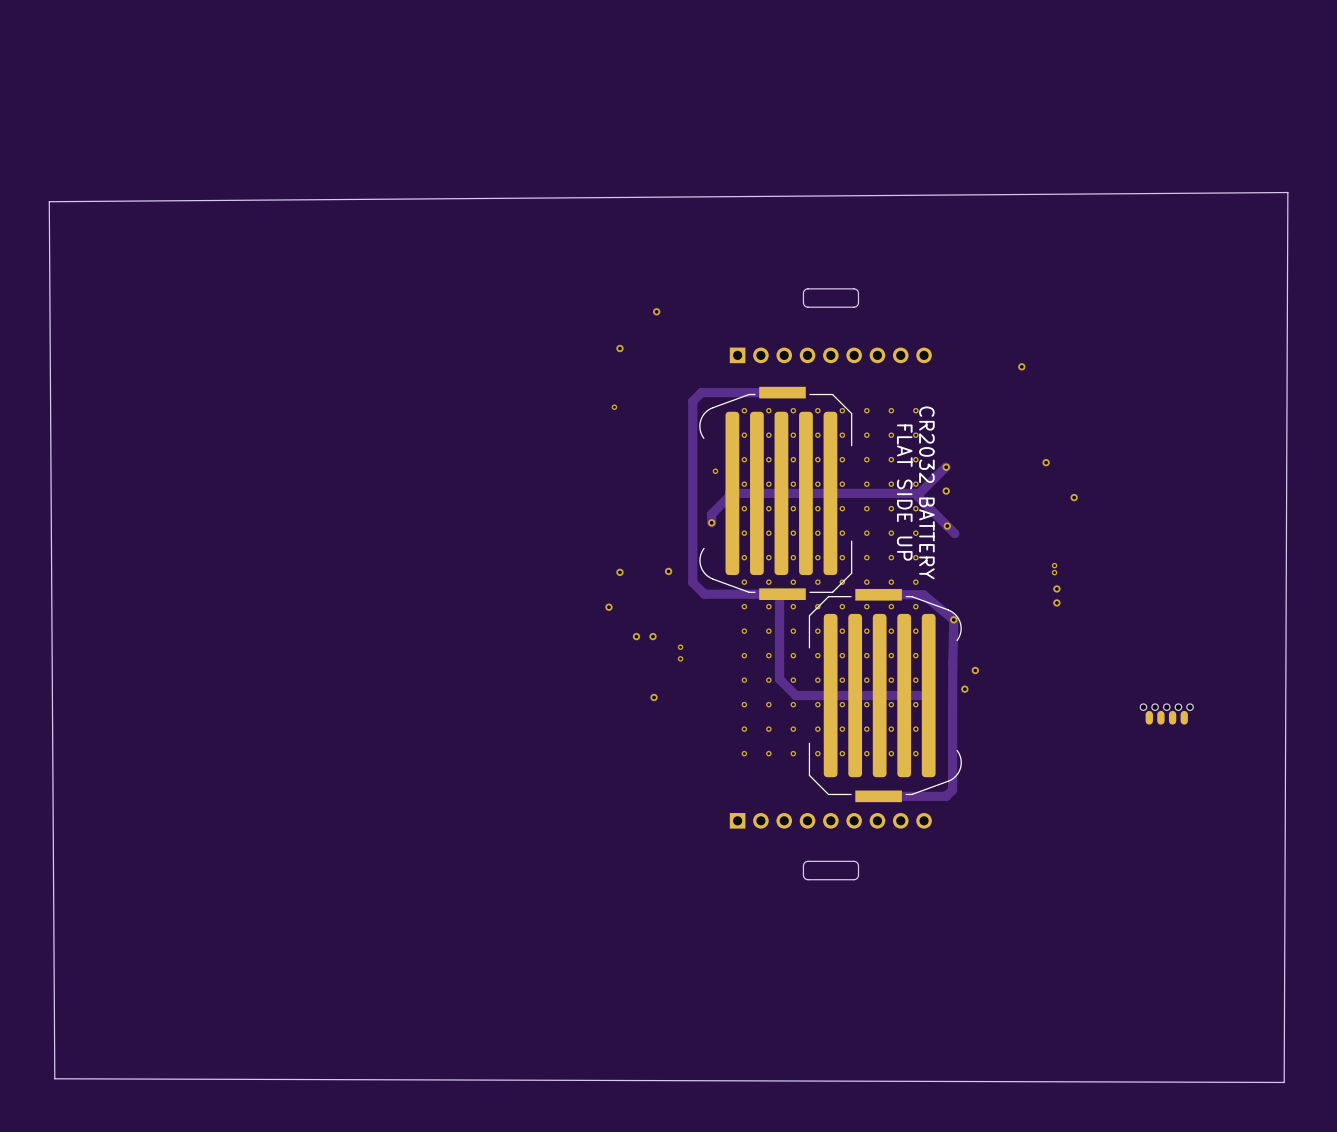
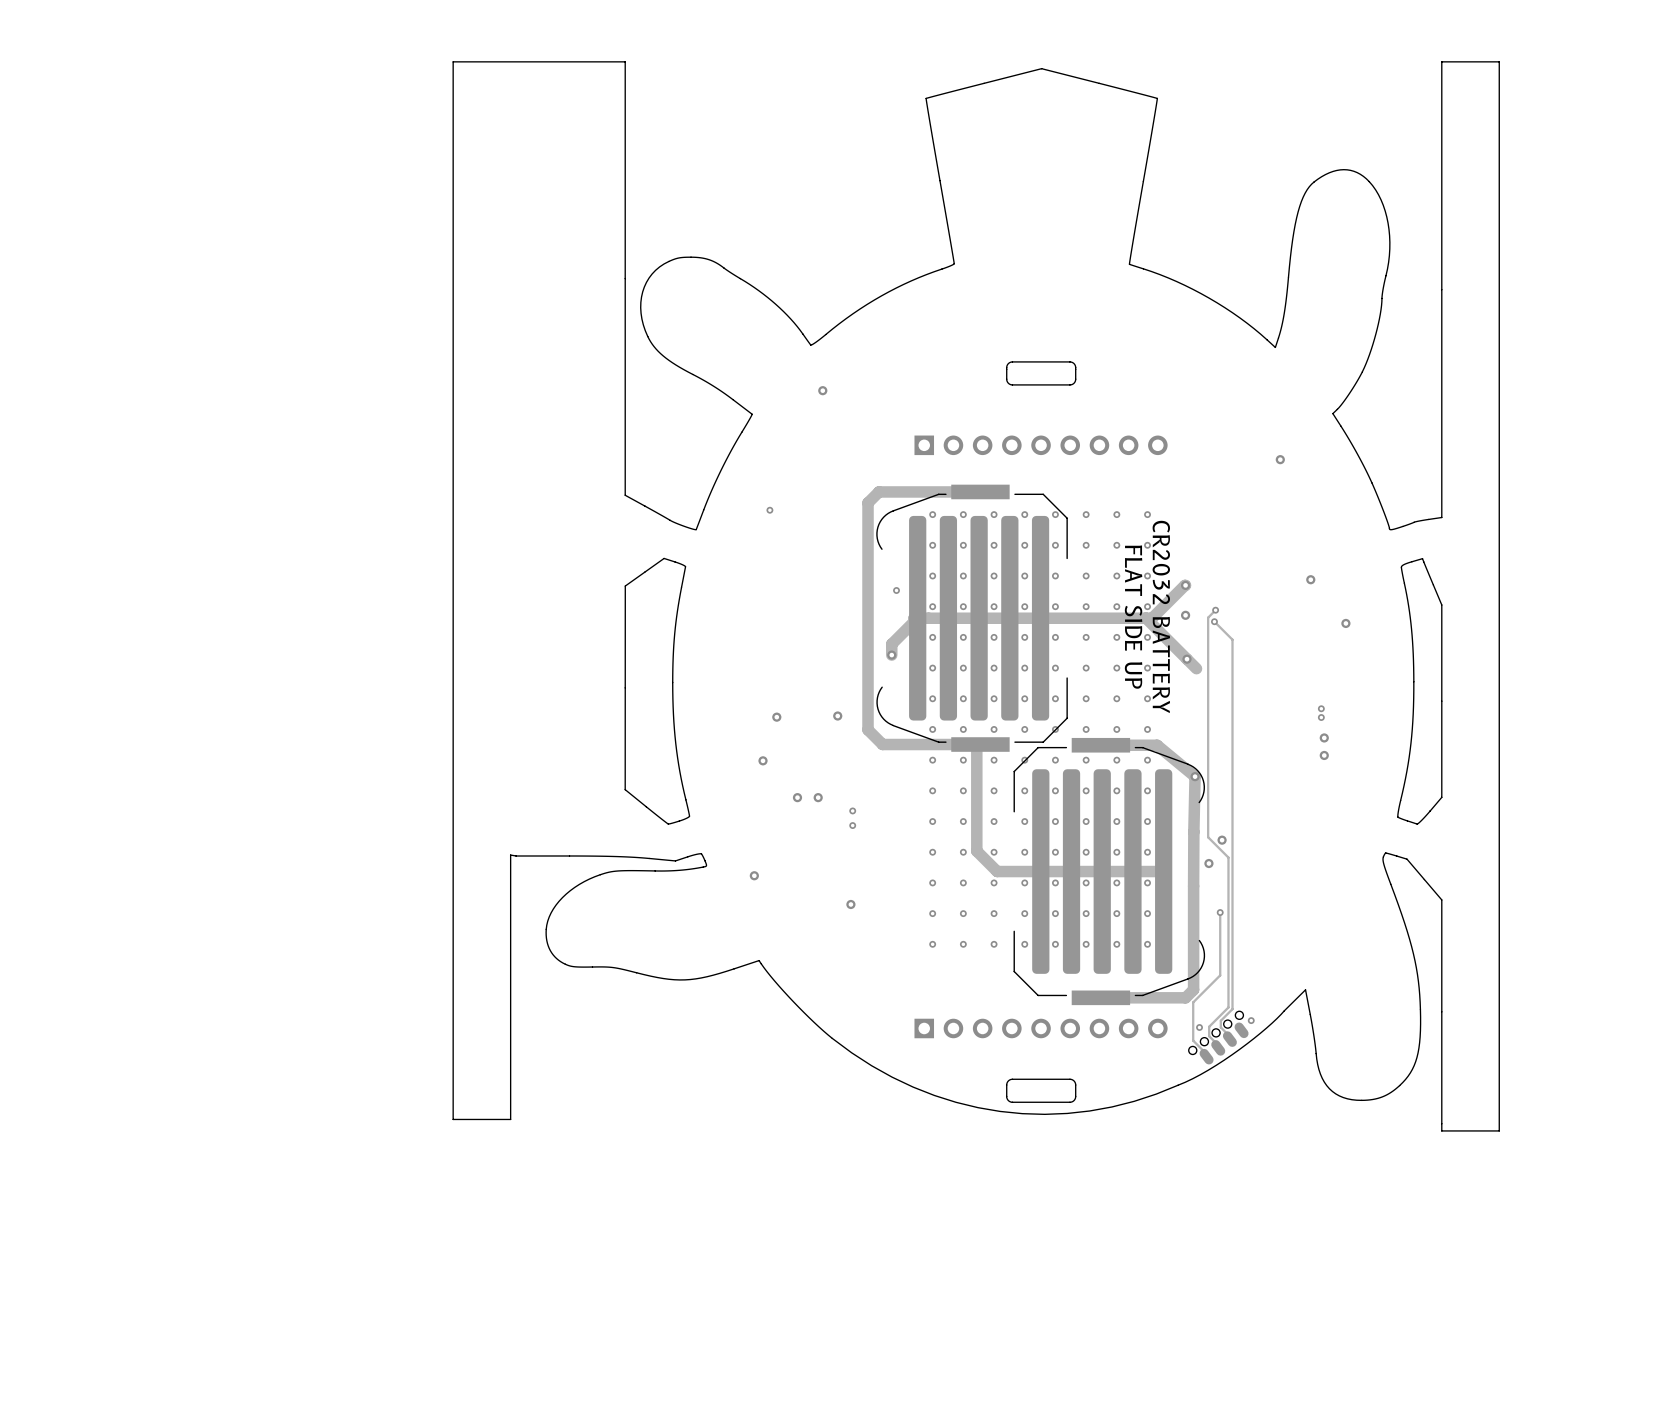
board edge: none -> (1499, 61) (1441, 61) (1441, 517) (1416, 521) (1389, 529) (1367, 472) (1332, 413) (1351, 390) (1367, 359) (1378, 324) (1388, 262) (1389, 242) (1386, 216) (1378, 194) (1369, 181) (1353, 171) (1336, 170) (1317, 179) (1305, 193) (1295, 224) (1284, 313) (1275, 347) (1247, 323) (1209, 298) (1168, 277) (1129, 264) (1157, 98) (1041, 68) (926, 98) (954, 263) (911, 280) (881, 295) (852, 313) (812, 344) (790, 318) (771, 300) (710, 260) (696, 257) (676, 258) (659, 266) (649, 278) (641, 297) (641, 313) (645, 330) (654, 346) (669, 360) (716, 387) (752, 414) (721, 470) (695, 529) (672, 521) (625, 495) (625, 61) (453, 61) (453, 1119) (510, 1119) (510, 855) (621, 856) (675, 860) (701, 853) (706, 863) (705, 866) (673, 870) (611, 871) (594, 876) (574, 887) (556, 905) (547, 921) (546, 938) (551, 952) (560, 961) (570, 966) (613, 967) (657, 977) (679, 979) (707, 976) (759, 960) (783, 991) (823, 1031) (851, 1052) (892, 1077) (913, 1087) (956, 1102) (1000, 1111) (1044, 1114) (1089, 1110) (1112, 1106) (1156, 1094) (1192, 1078) (1224, 1060) (1253, 1038) (1305, 989) (1317, 1064) (1322, 1078) (1329, 1088) (1343, 1097) (1361, 1100) (1380, 1097) (1395, 1089) (1410, 1072) (1416, 1057) (1420, 1037) (1420, 1002) (1417, 974) (1411, 946) (1383, 863) (1383, 857) (1385, 853) (1406, 859) (1441, 899) (1441, 1130) (1499, 1130) (1499, 61)
board edge: (1287, 192) (1284, 1082) (54, 1078) (49, 201) (1287, 192) -> none
via: (619, 348) -> none
board edge: none -> (664, 558) (625, 586) (625, 789) (668, 824) (689, 816) (676, 750) (672, 690) (675, 628) (685, 566) (664, 558)
board edge: none -> (1422, 558) (1405, 564) (1401, 567) (1411, 629) (1413, 698) (1410, 750) (1397, 816) (1417, 824) (1441, 797) (1441, 604) (1422, 558)
track: none -> (1215, 610) (1208, 617) (1208, 837) (1228, 857) (1228, 1007) (1209, 1026) (1209, 1036) (1218, 1045) (1218, 1047)
via: none -> (1215, 610)
track: none -> (1214, 621) (1232, 639) (1232, 1009) (1220, 1020) (1220, 1027) (1229, 1036) (1229, 1039)
via: none -> (1214, 621)
via: (654, 697) -> none
via: none -> (754, 875)
part: (1166, 714) -> none
via: none -> (850, 904)
track: none -> (1220, 912) (1220, 975) (1193, 1002) (1193, 1040) (1206, 1054) (1206, 1056)
via: none -> (1220, 912)
via: none -> (1251, 1020)
via: none -> (1199, 1027)
part: none -> (1218, 1037)

